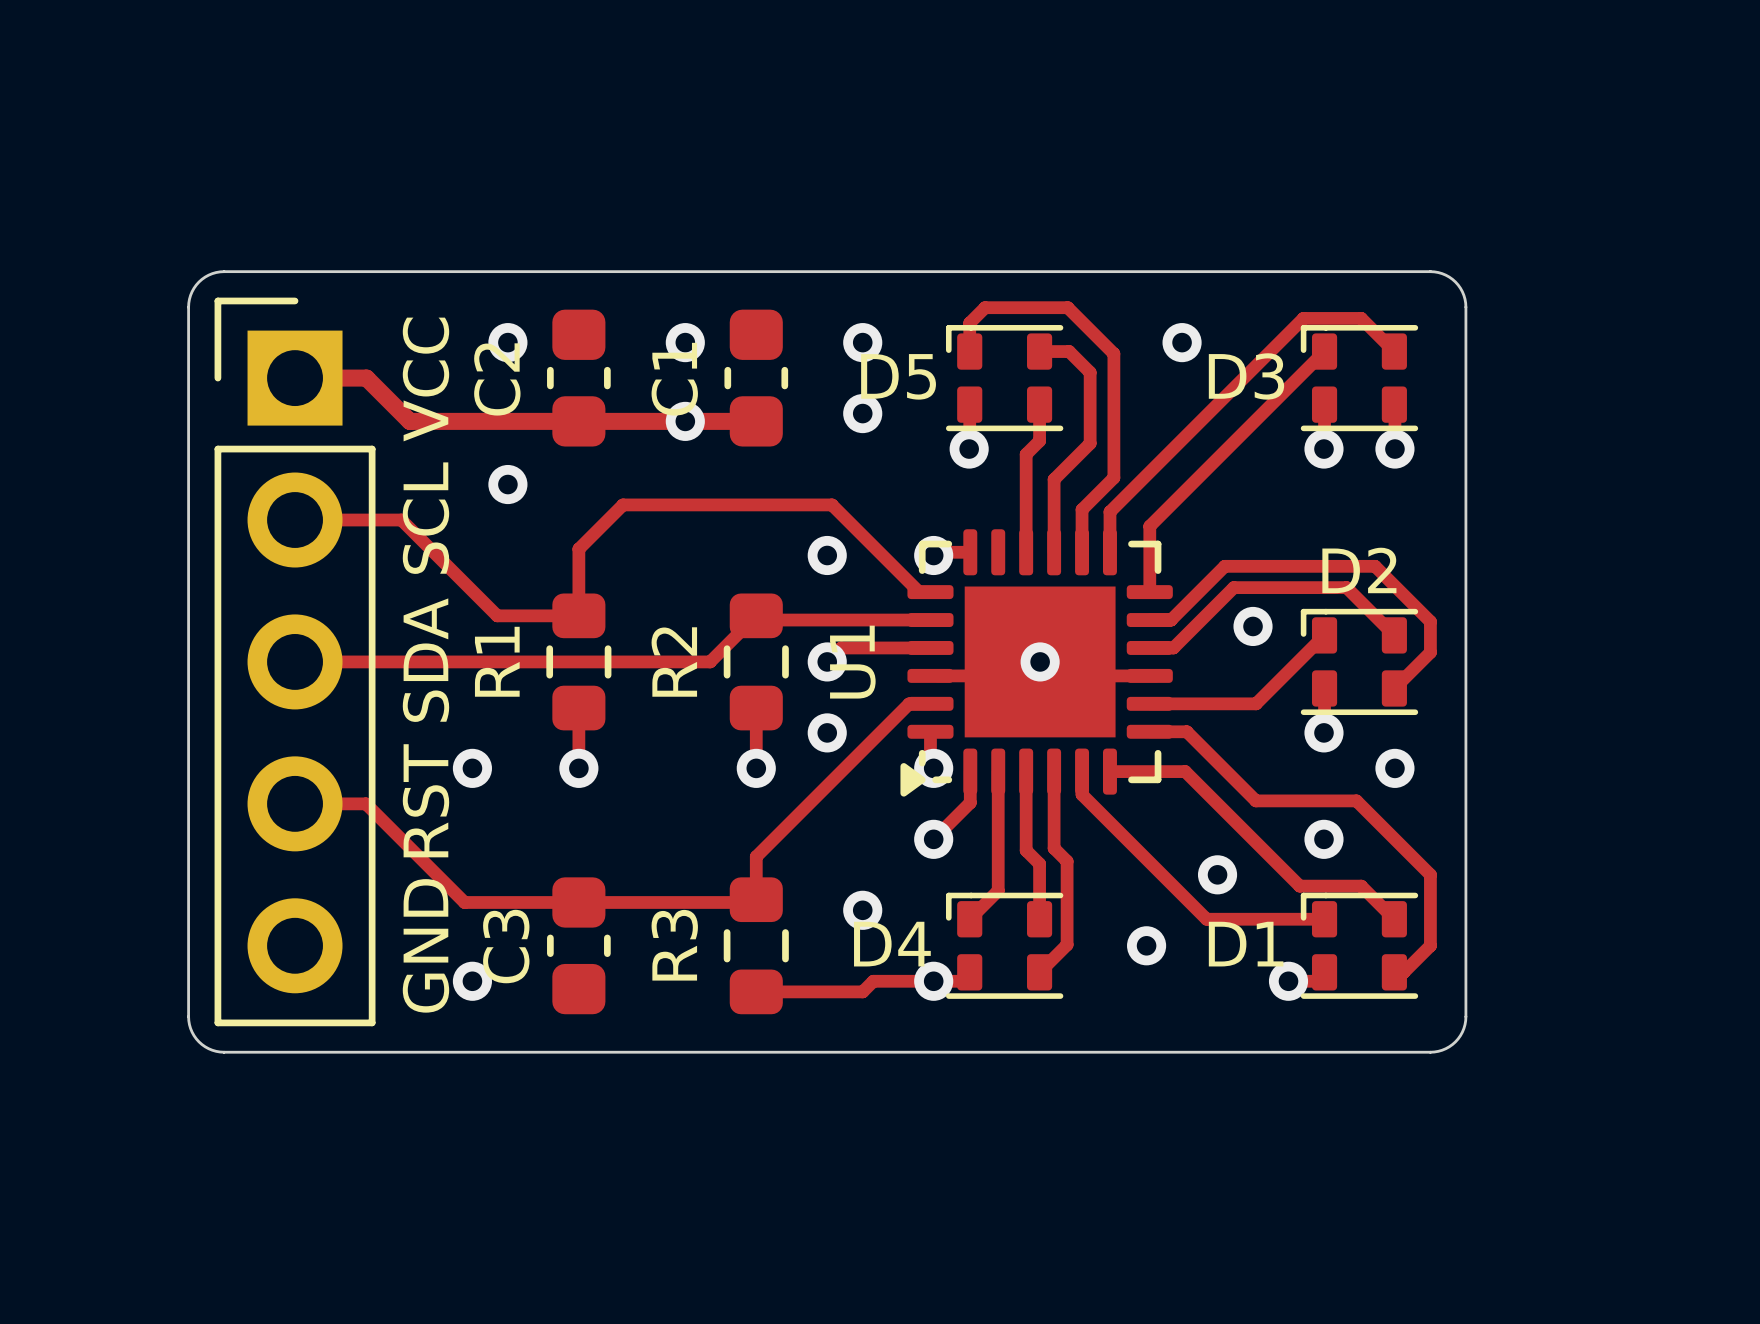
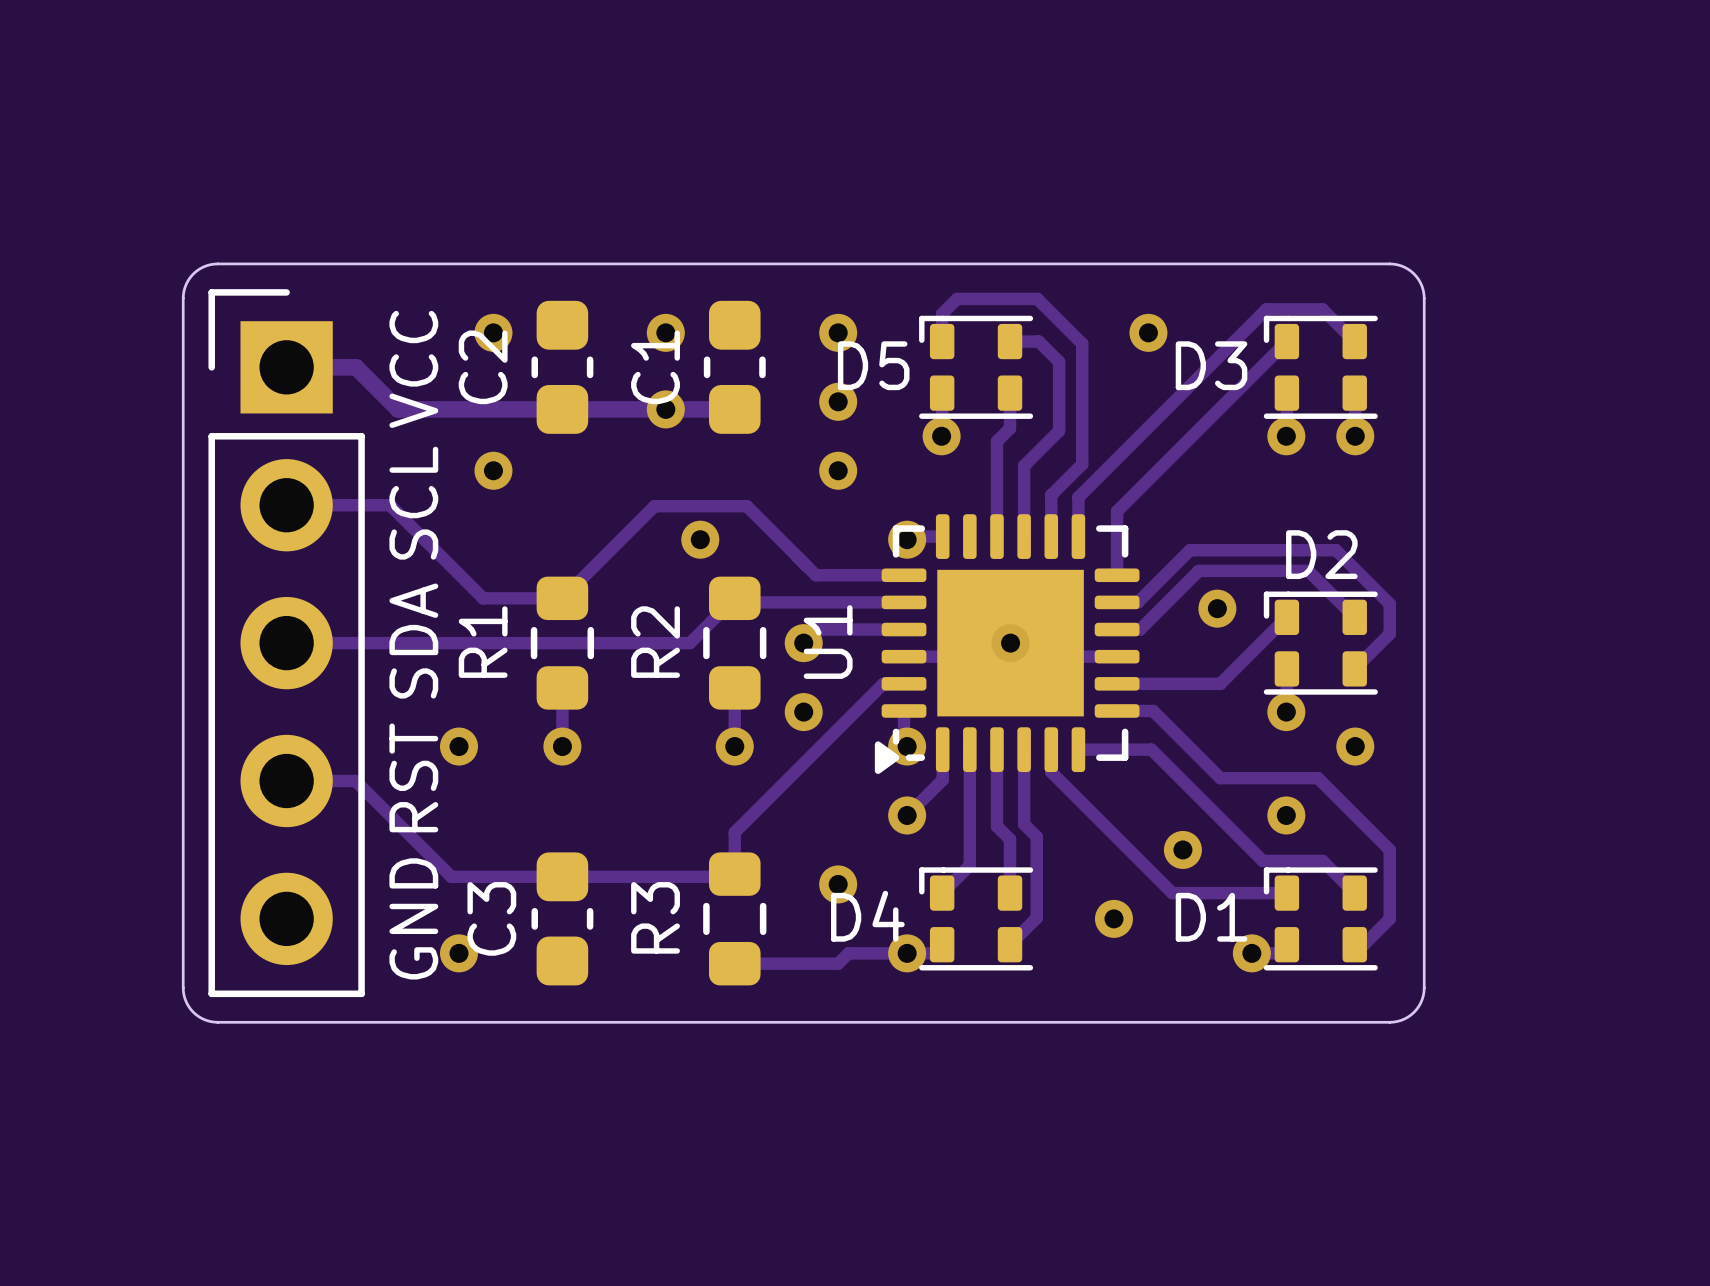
via: none -> (838, 470)
via: none -> (700, 539)
via: (827, 555) -> none
track: (919, 592) (831, 504) (623, 504) (578, 549) (578, 615) -> (904, 575) (815, 575) (746, 506) (654, 506) (562, 598)

